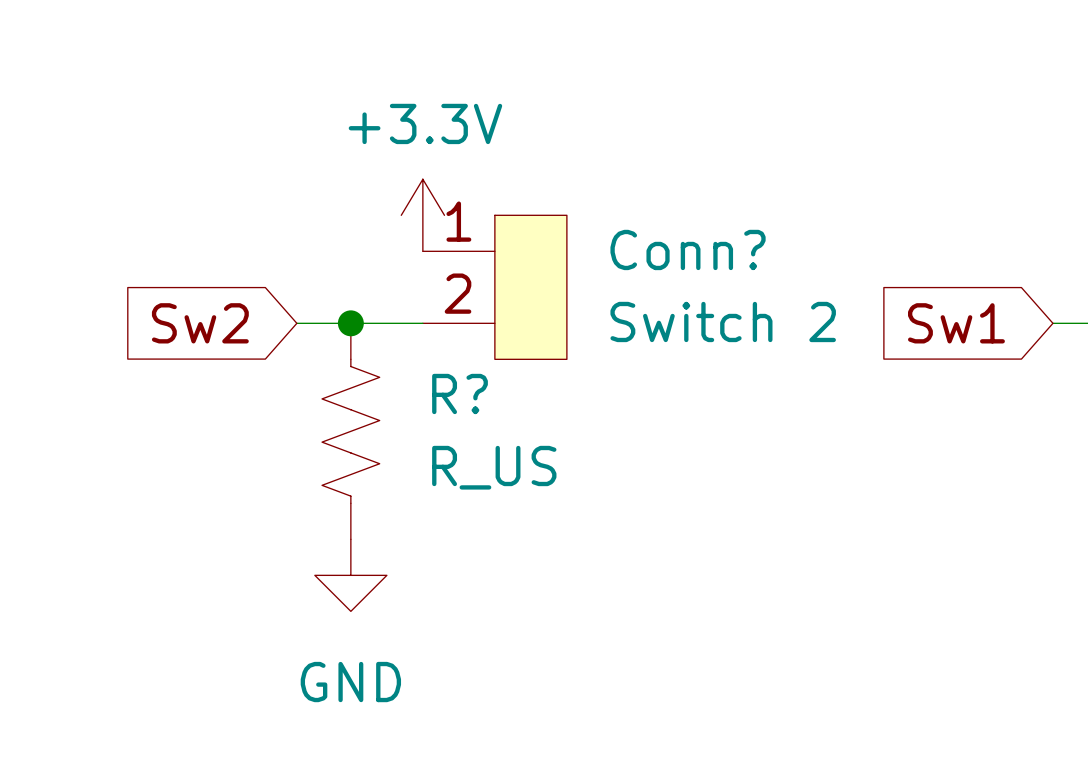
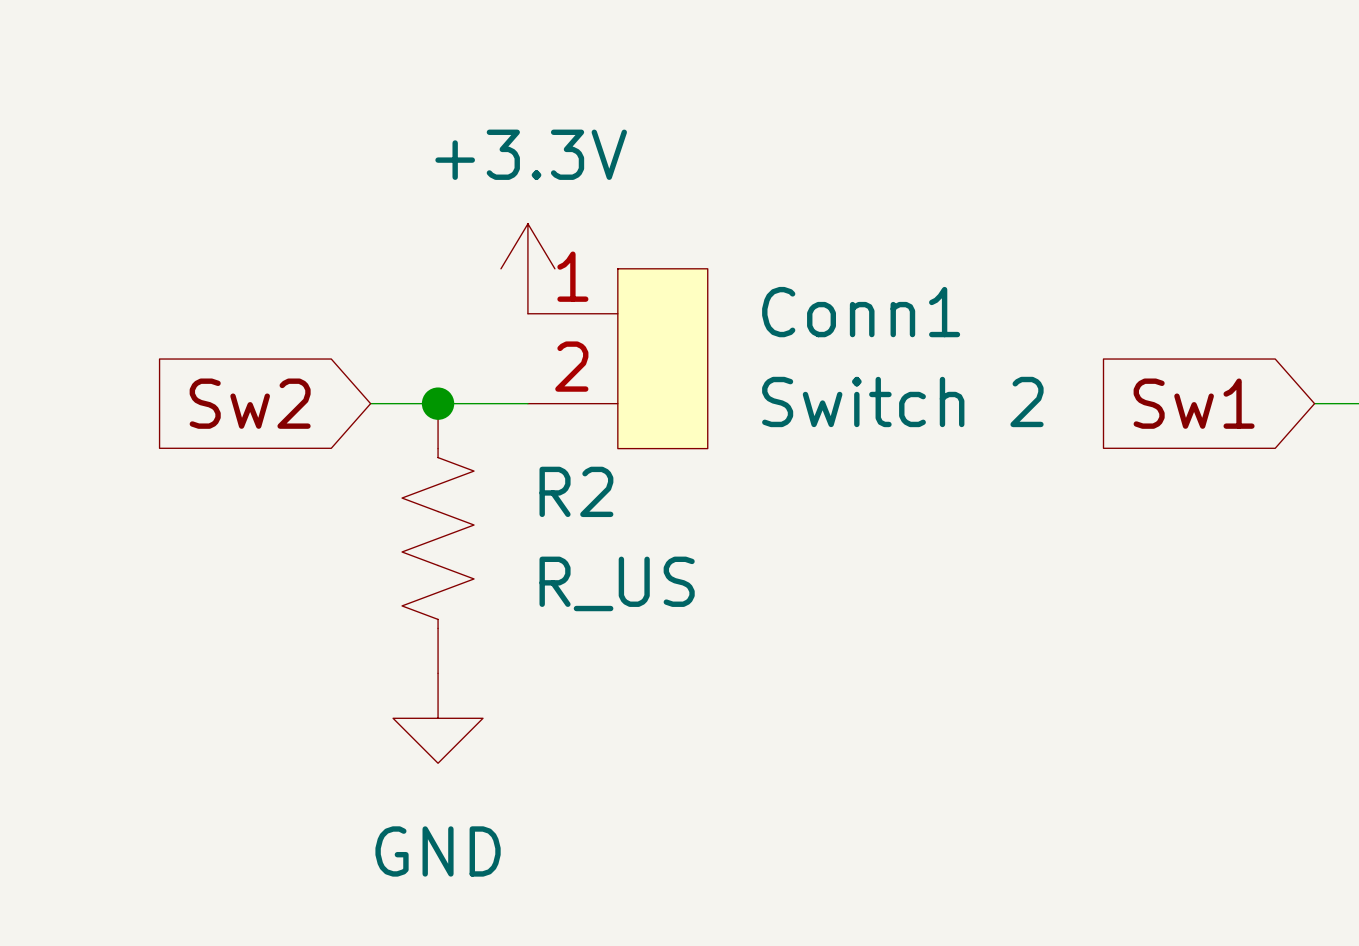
Conn? name: Conn? (688, 249) -> Conn1 (861, 312)
R? name: R? (460, 393) -> R2 (576, 491)

